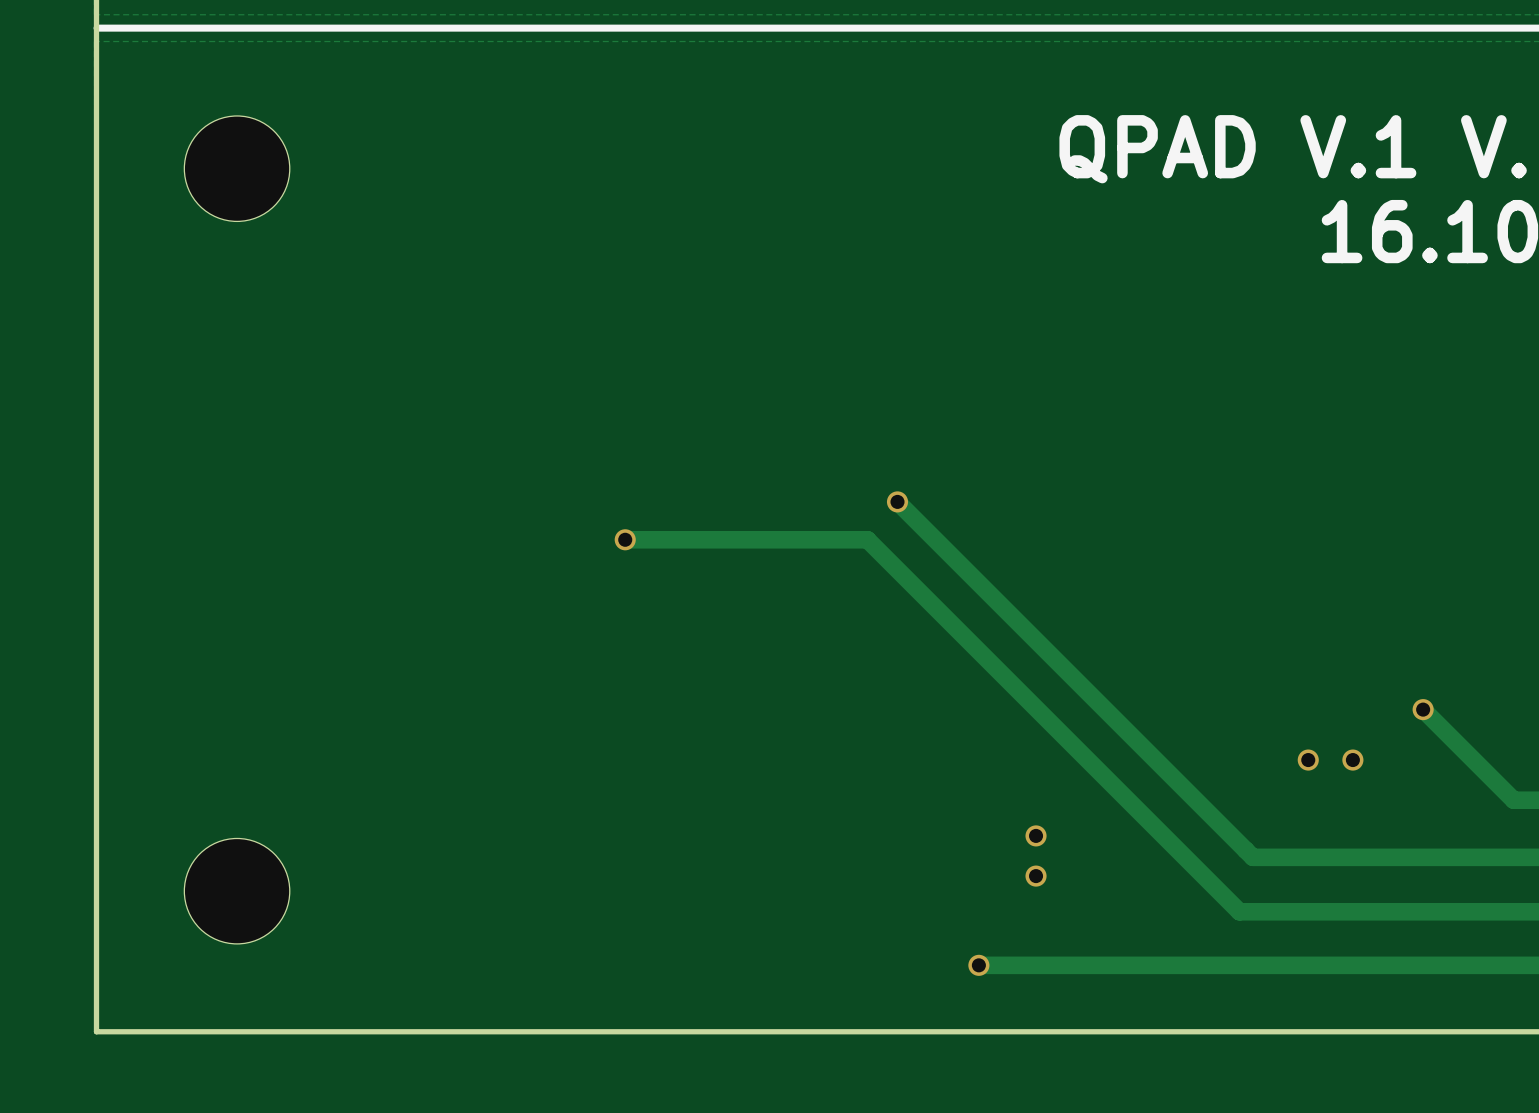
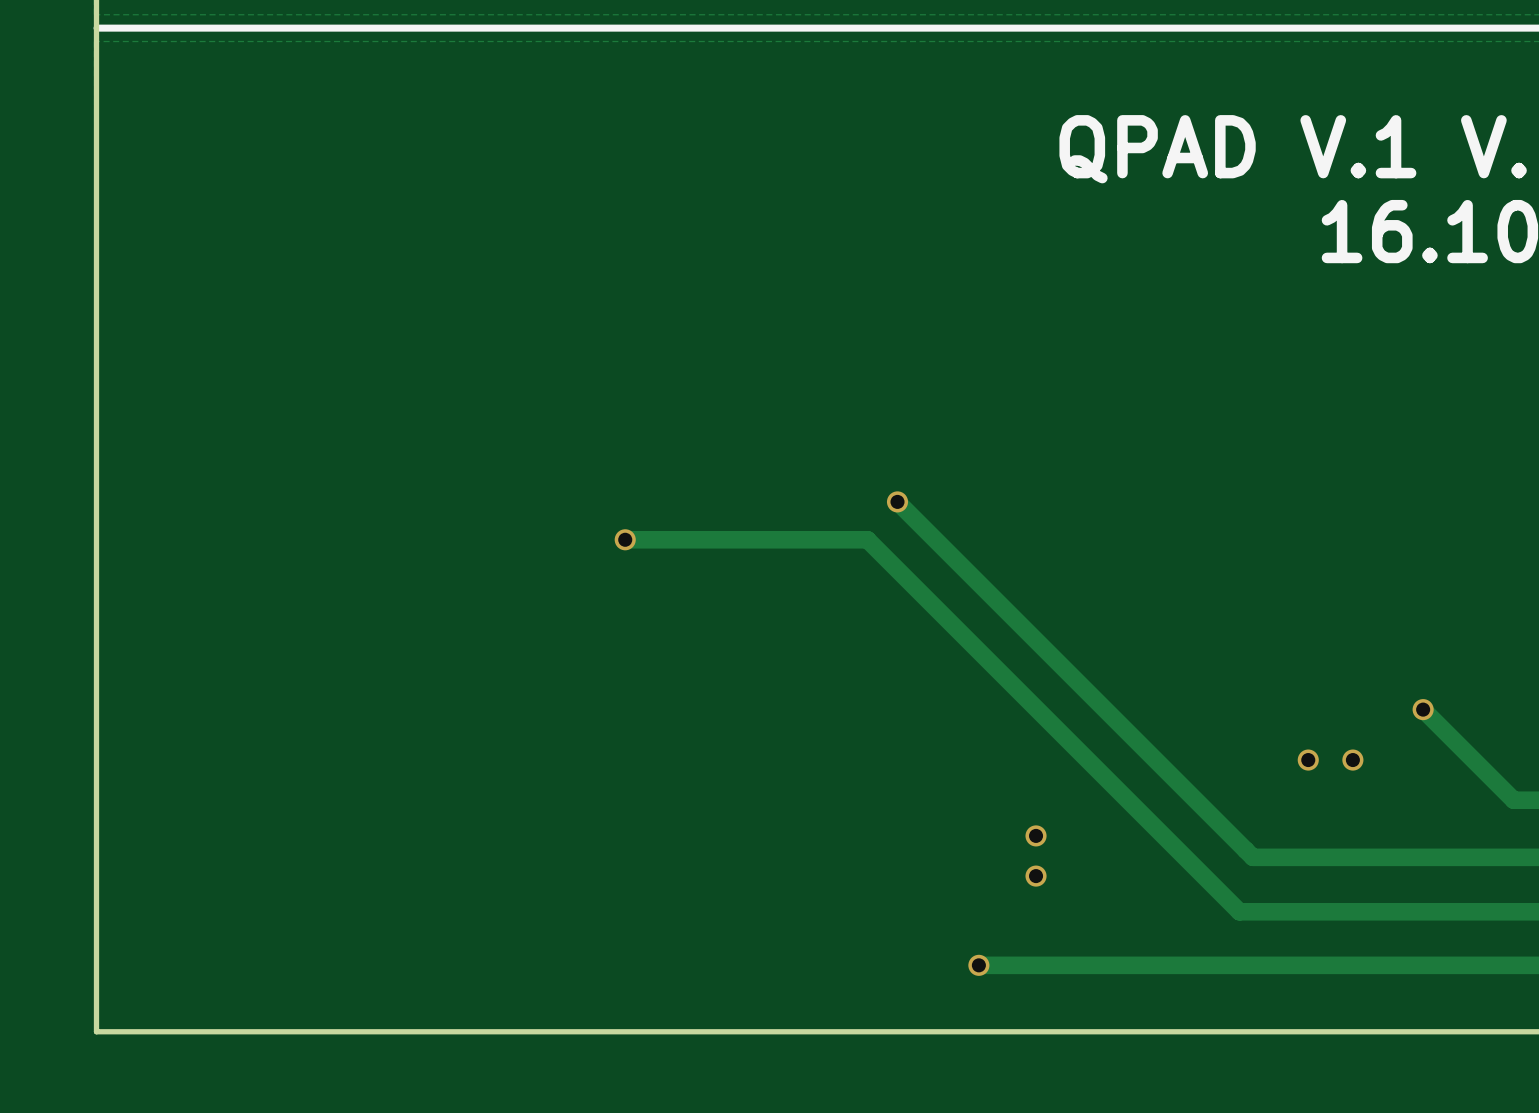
part: (237, 168) -> none
part: (237, 891) -> none

